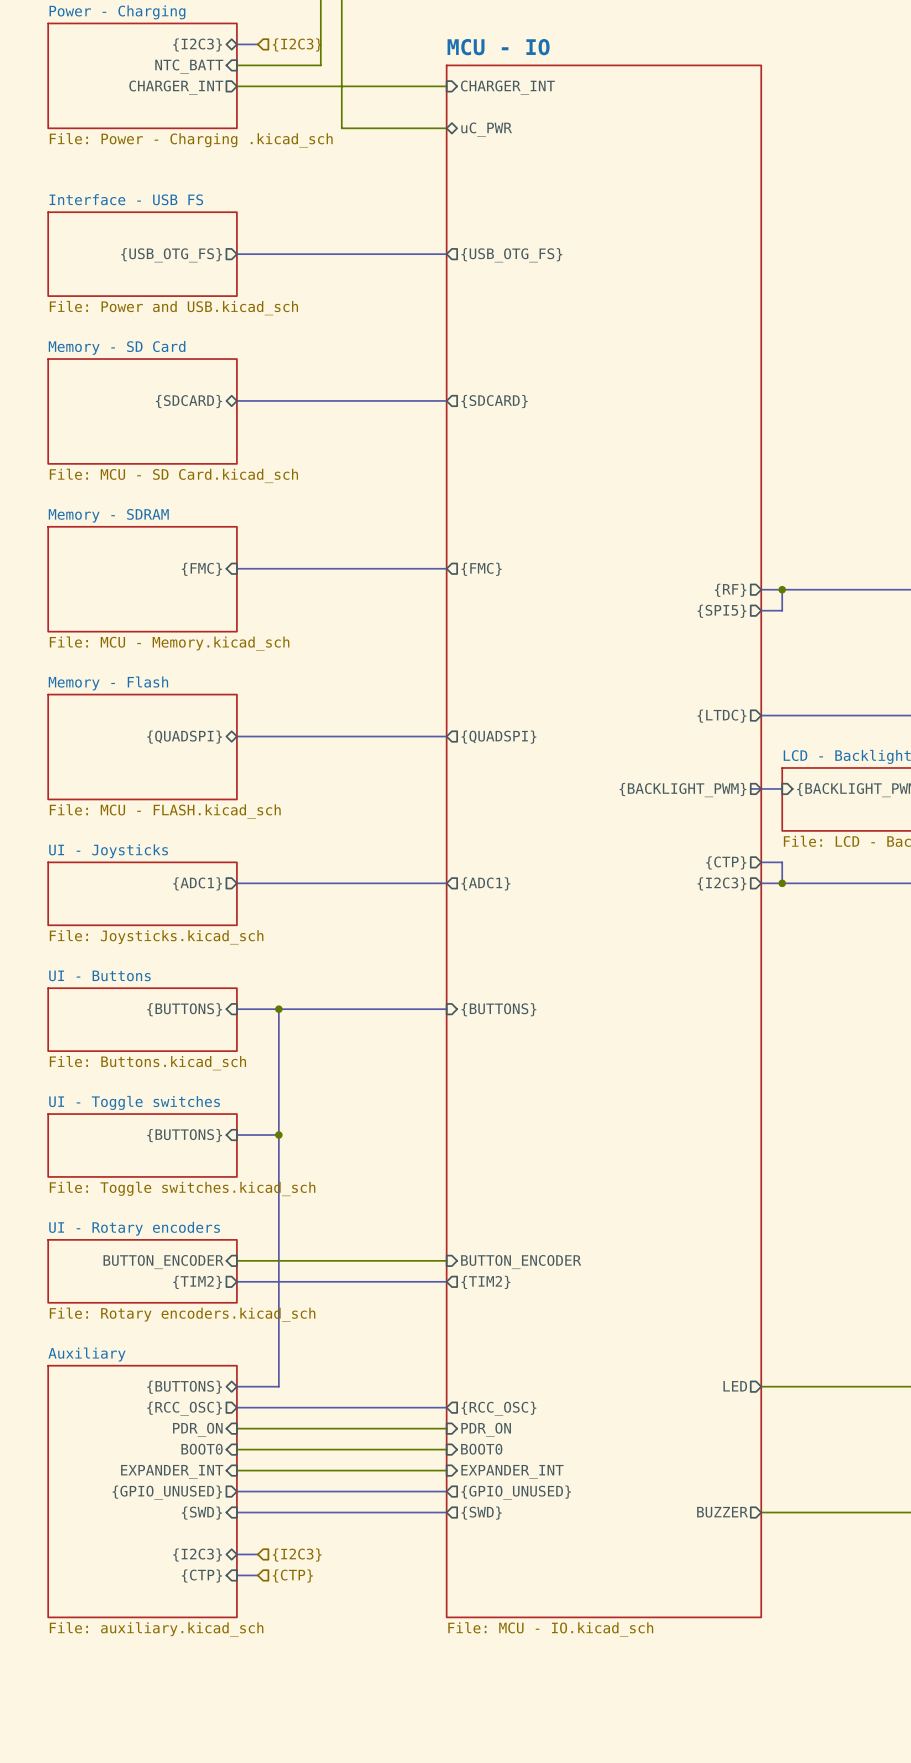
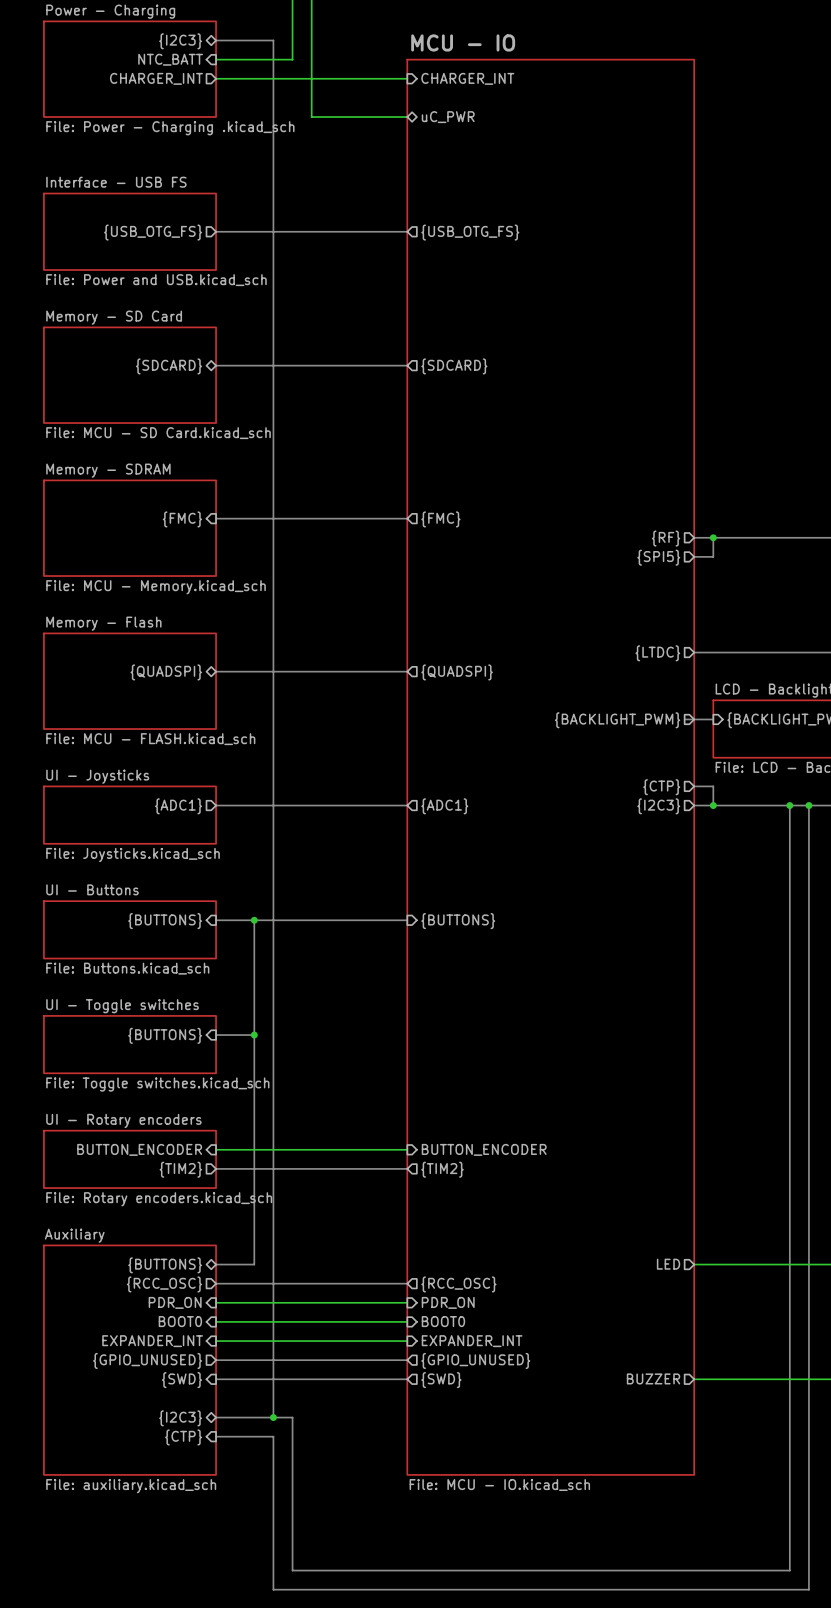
bus: none -> (235, 40) (273, 40) (273, 1417)
hierarchical label: {I2C3} (297, 44) -> none
bus: none -> (789, 805) (789, 1570) (292, 1570) (292, 1417) (235, 1417)
junction: none -> (789, 805)
bus: none -> (808, 805) (808, 1589) (273, 1589) (273, 1436) (235, 1436)
junction: none -> (808, 805)
junction: none -> (273, 1417)
hierarchical label: {I2C3} (297, 1555) -> none
hierarchical label: {CTP} (292, 1576) -> none

